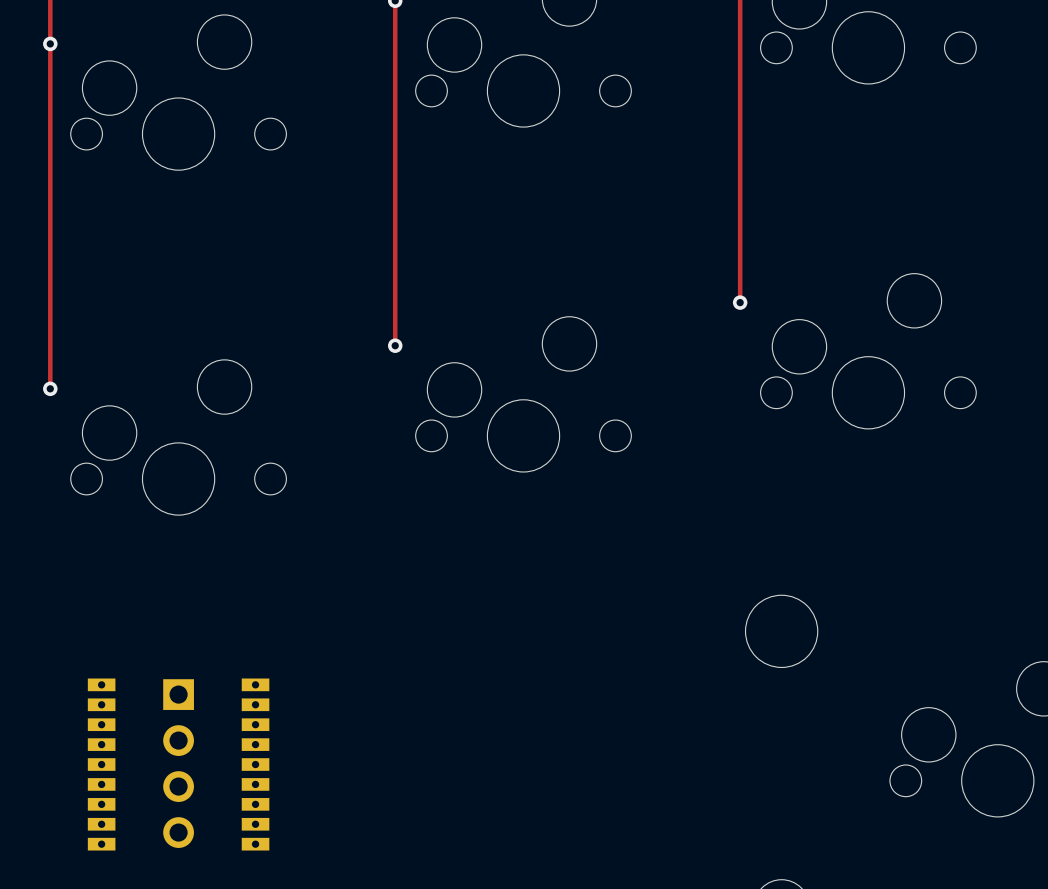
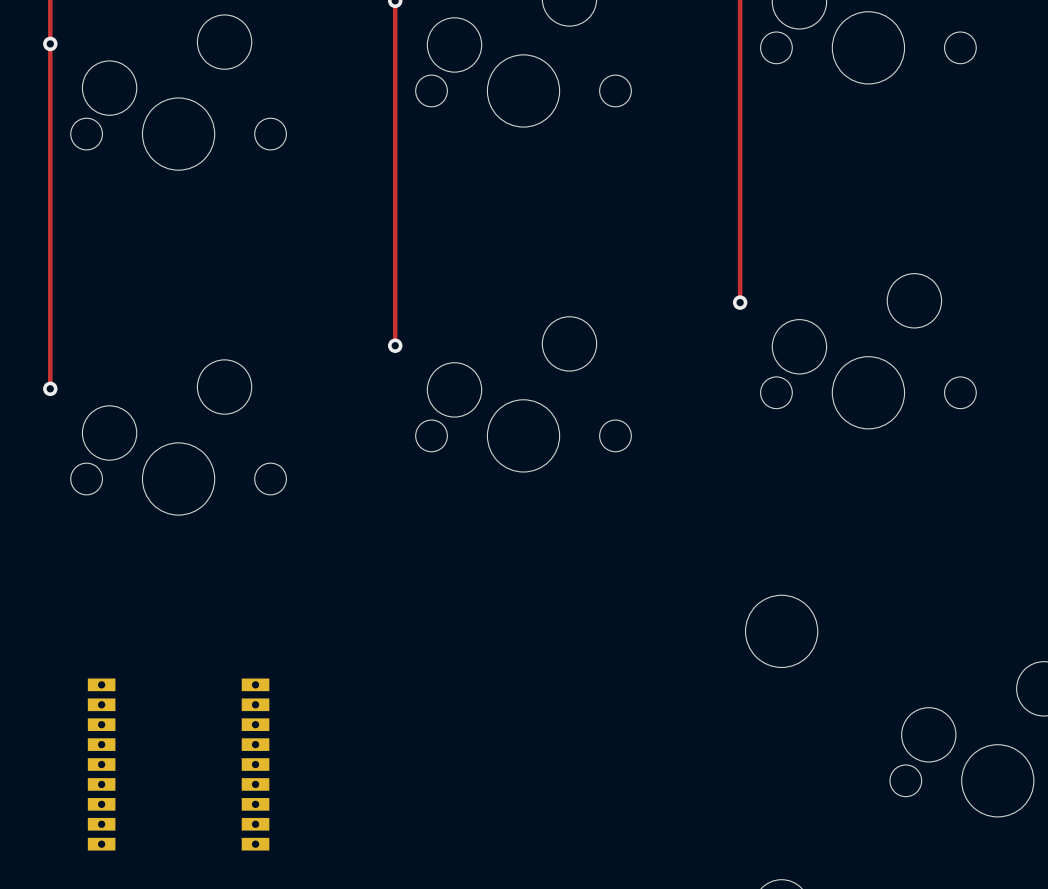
part: (178, 763) -> none

